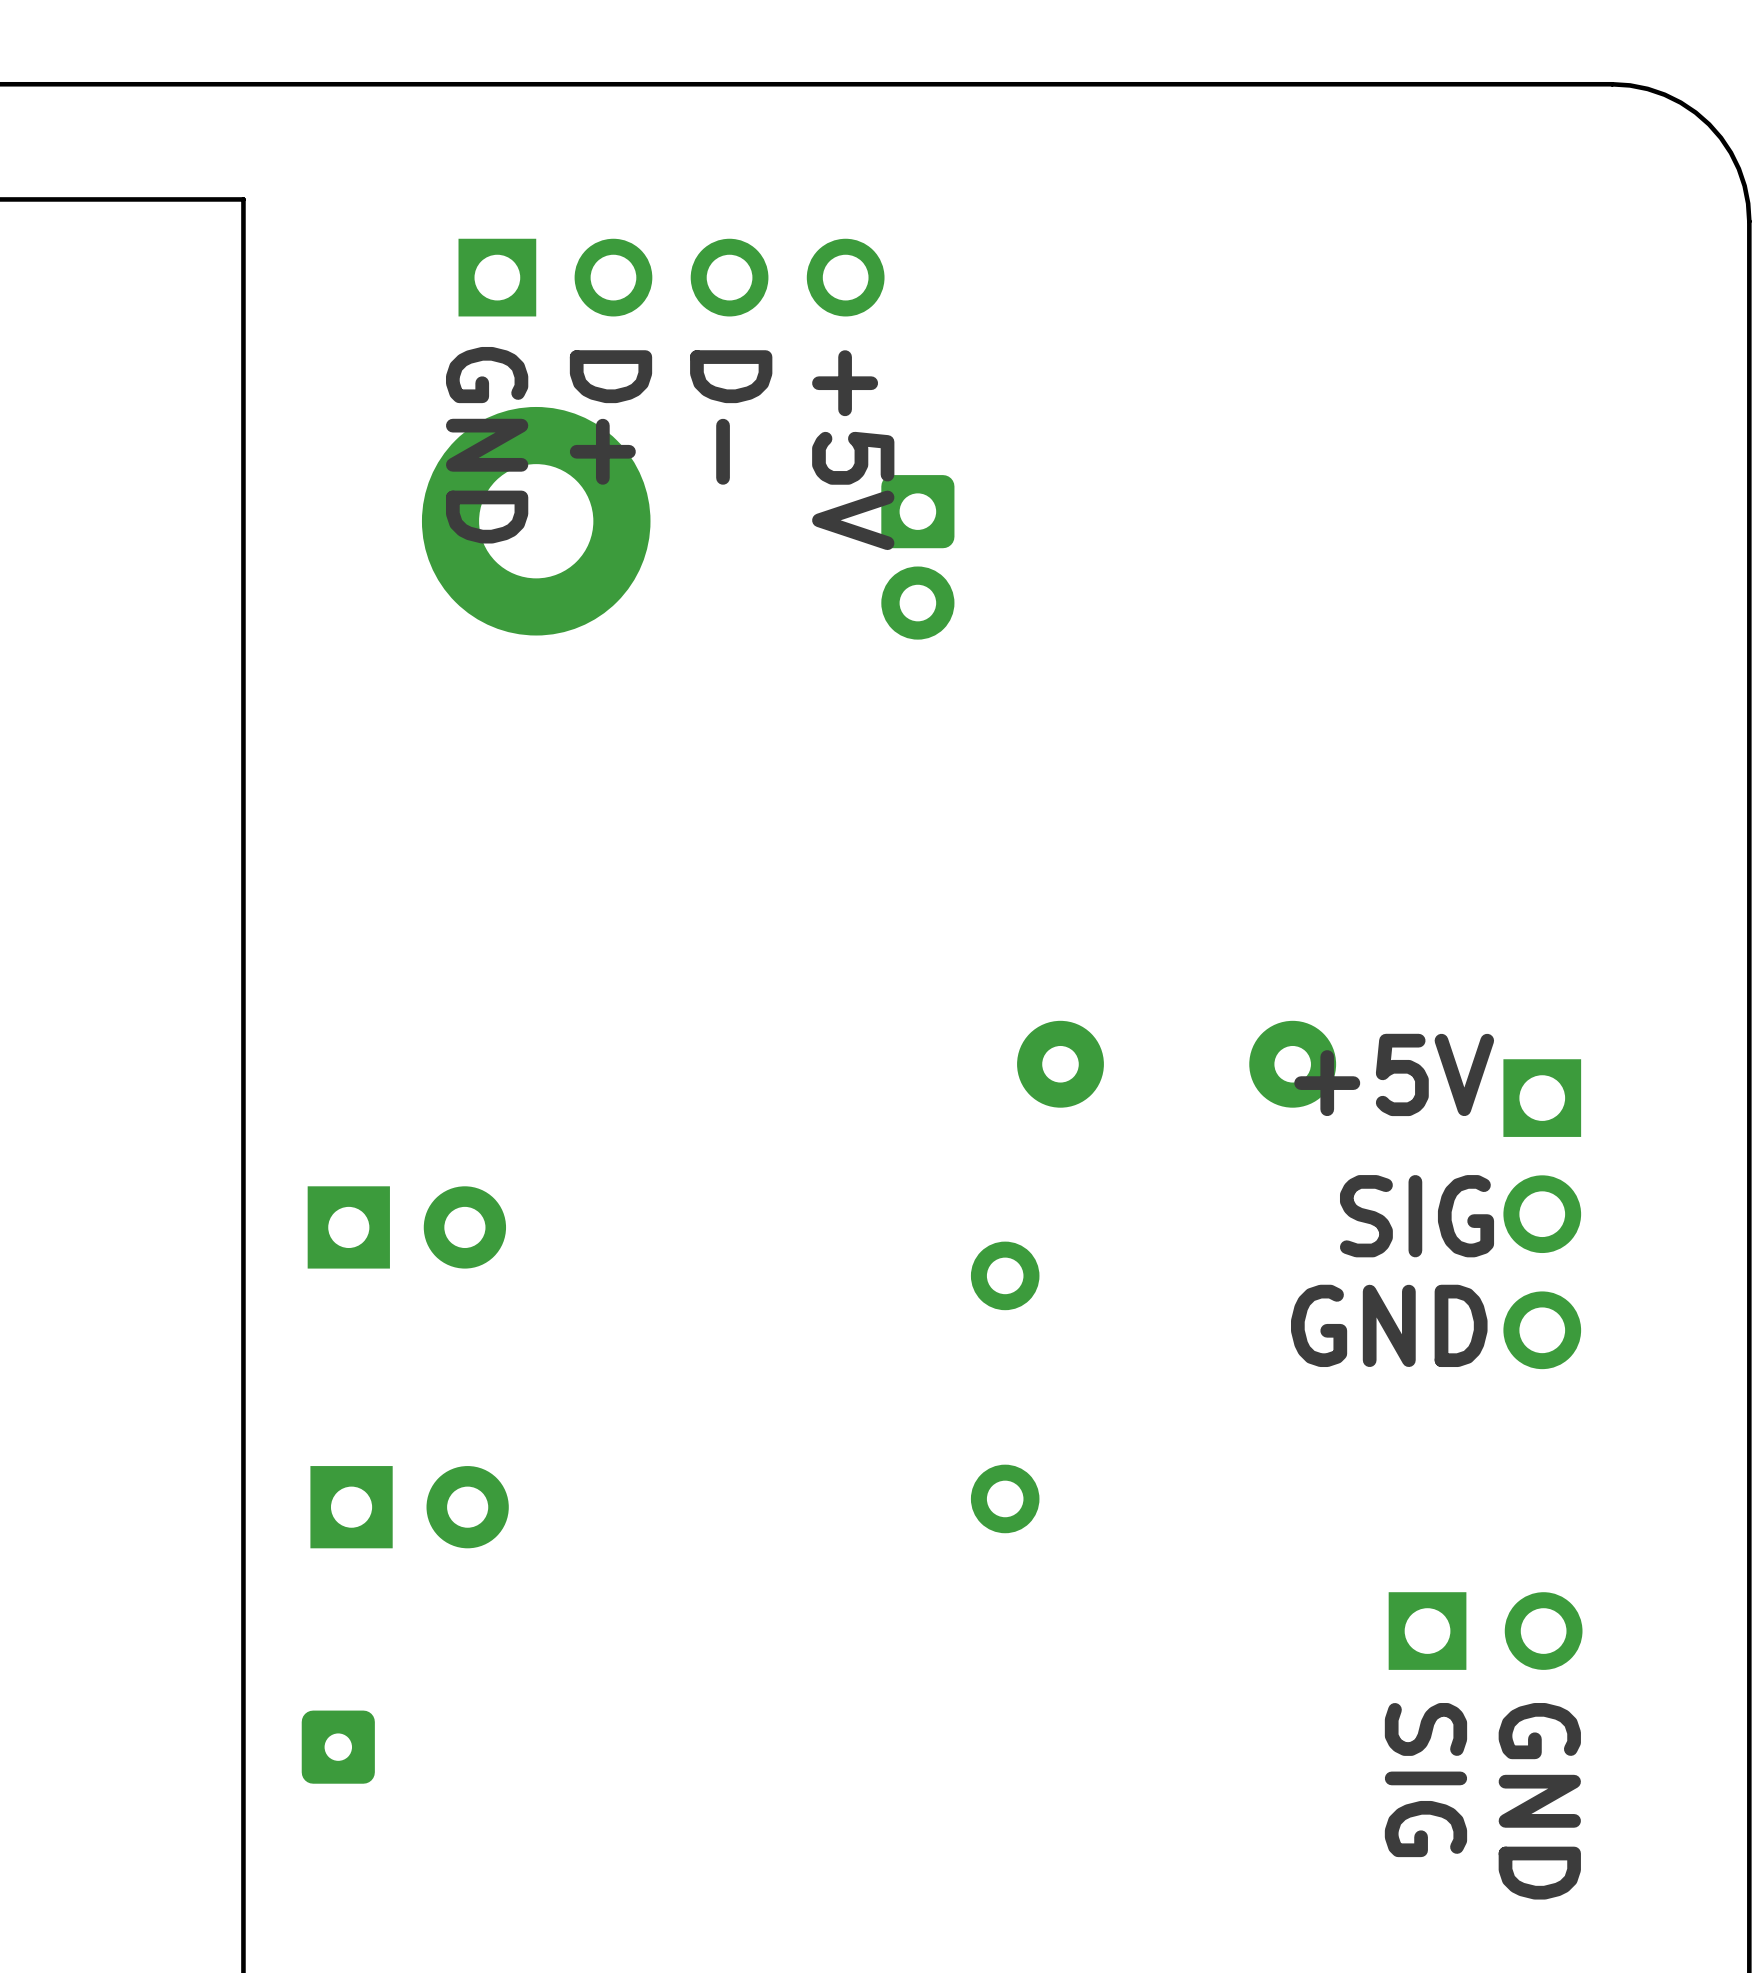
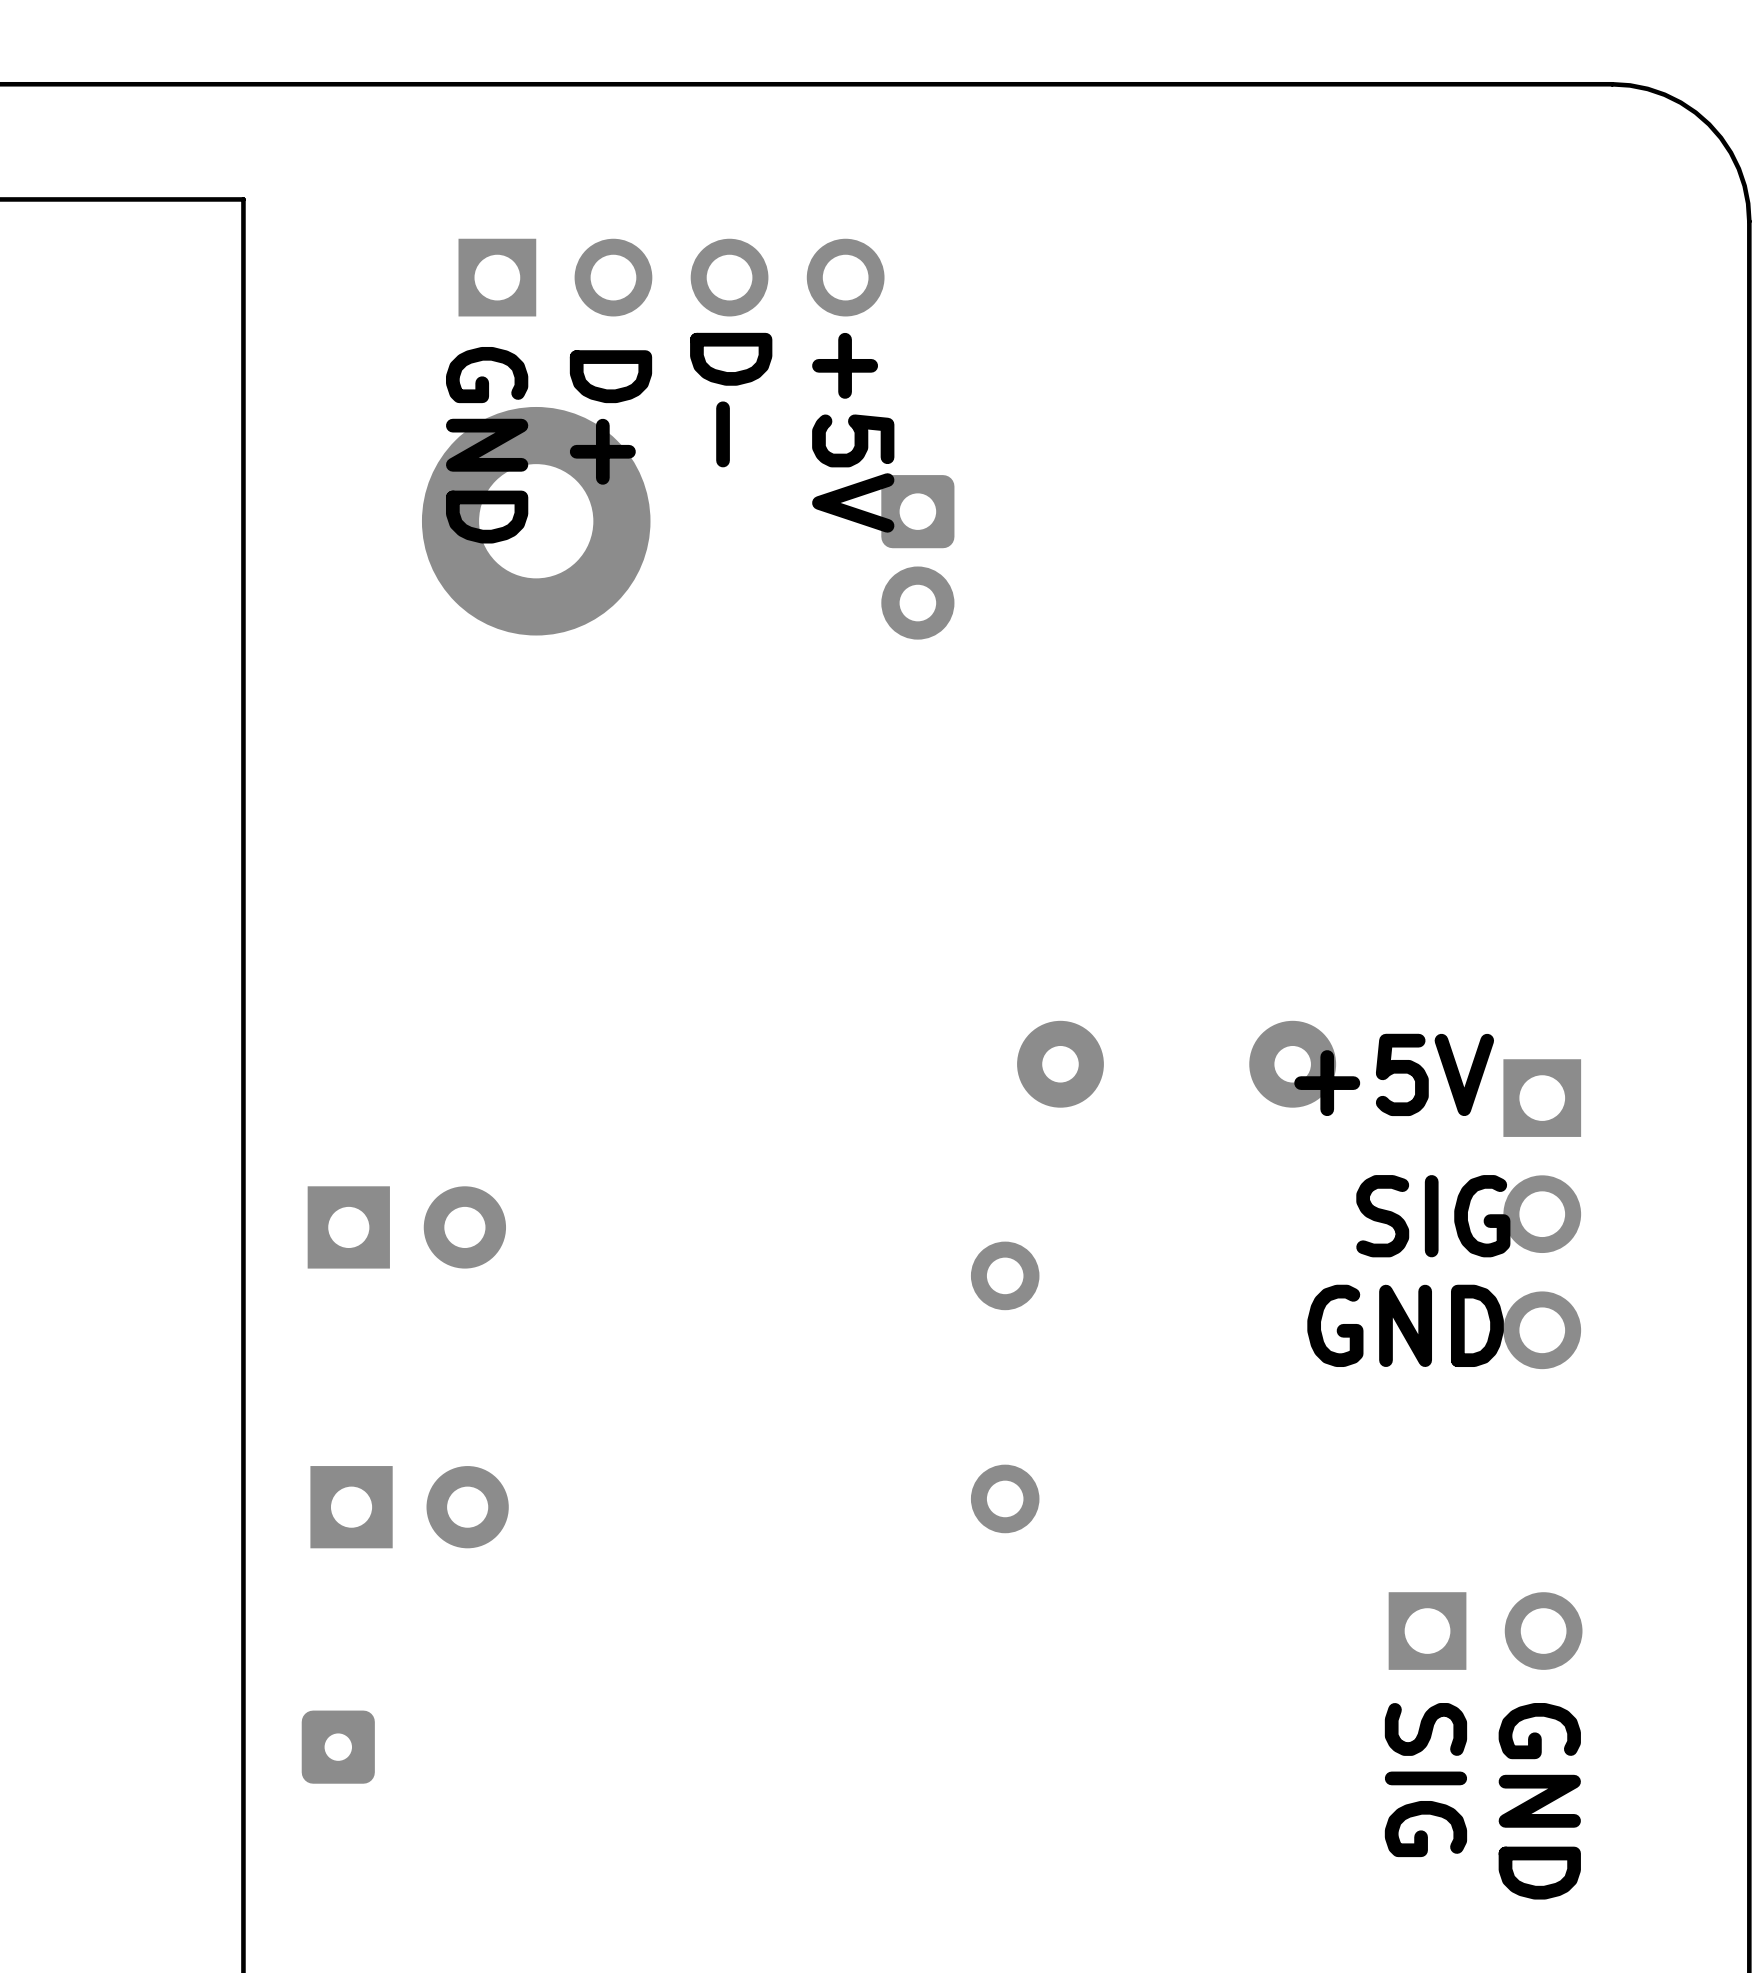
text position: D- (731, 417) -> D- (731, 400)
text position: +5V (853, 450) -> +5V (853, 432)
text position: SIG (1417, 1216) -> SIG (1433, 1216)
text position: GND (1389, 1325) -> GND (1405, 1325)

